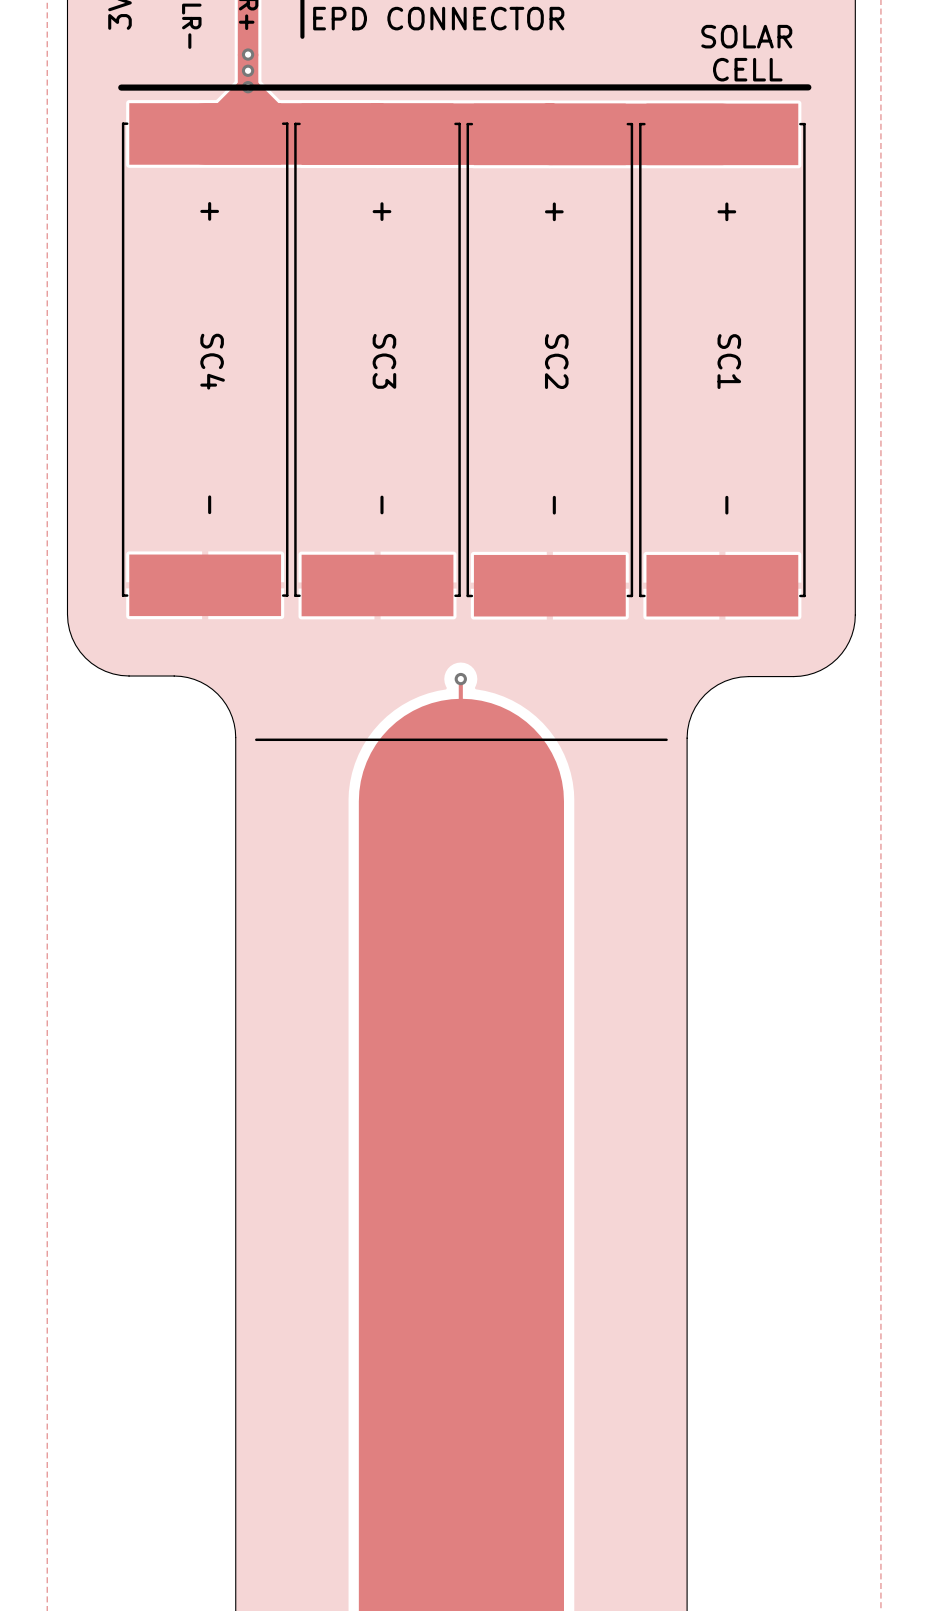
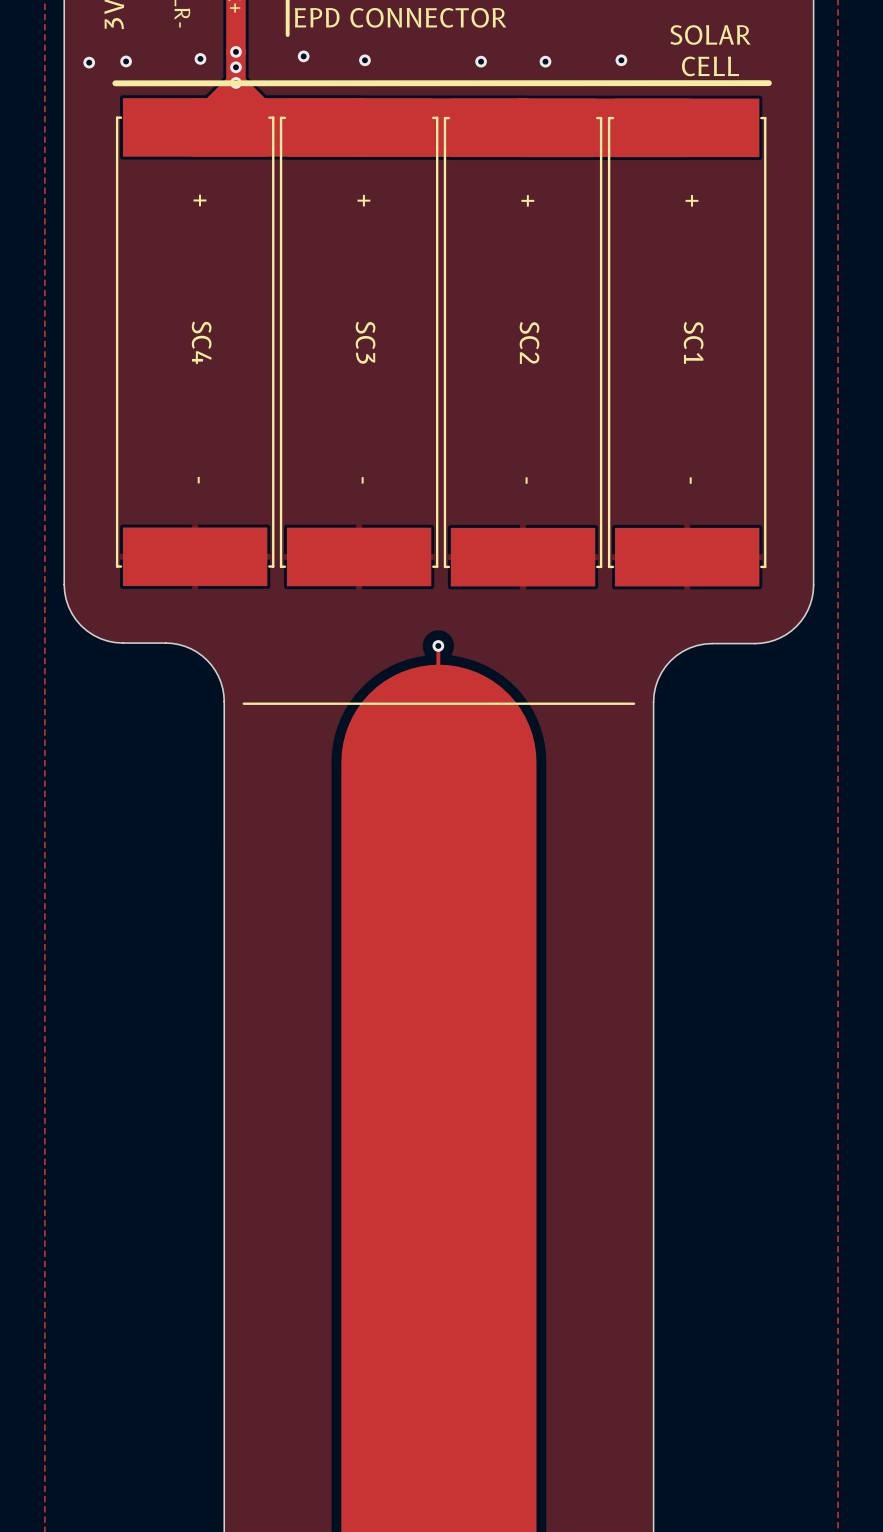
via: none -> (303, 56)
via: none -> (200, 58)
via: none -> (364, 60)
via: none -> (621, 60)
via: none -> (126, 61)
via: none -> (481, 61)
via: none -> (545, 61)
via: none -> (89, 62)

